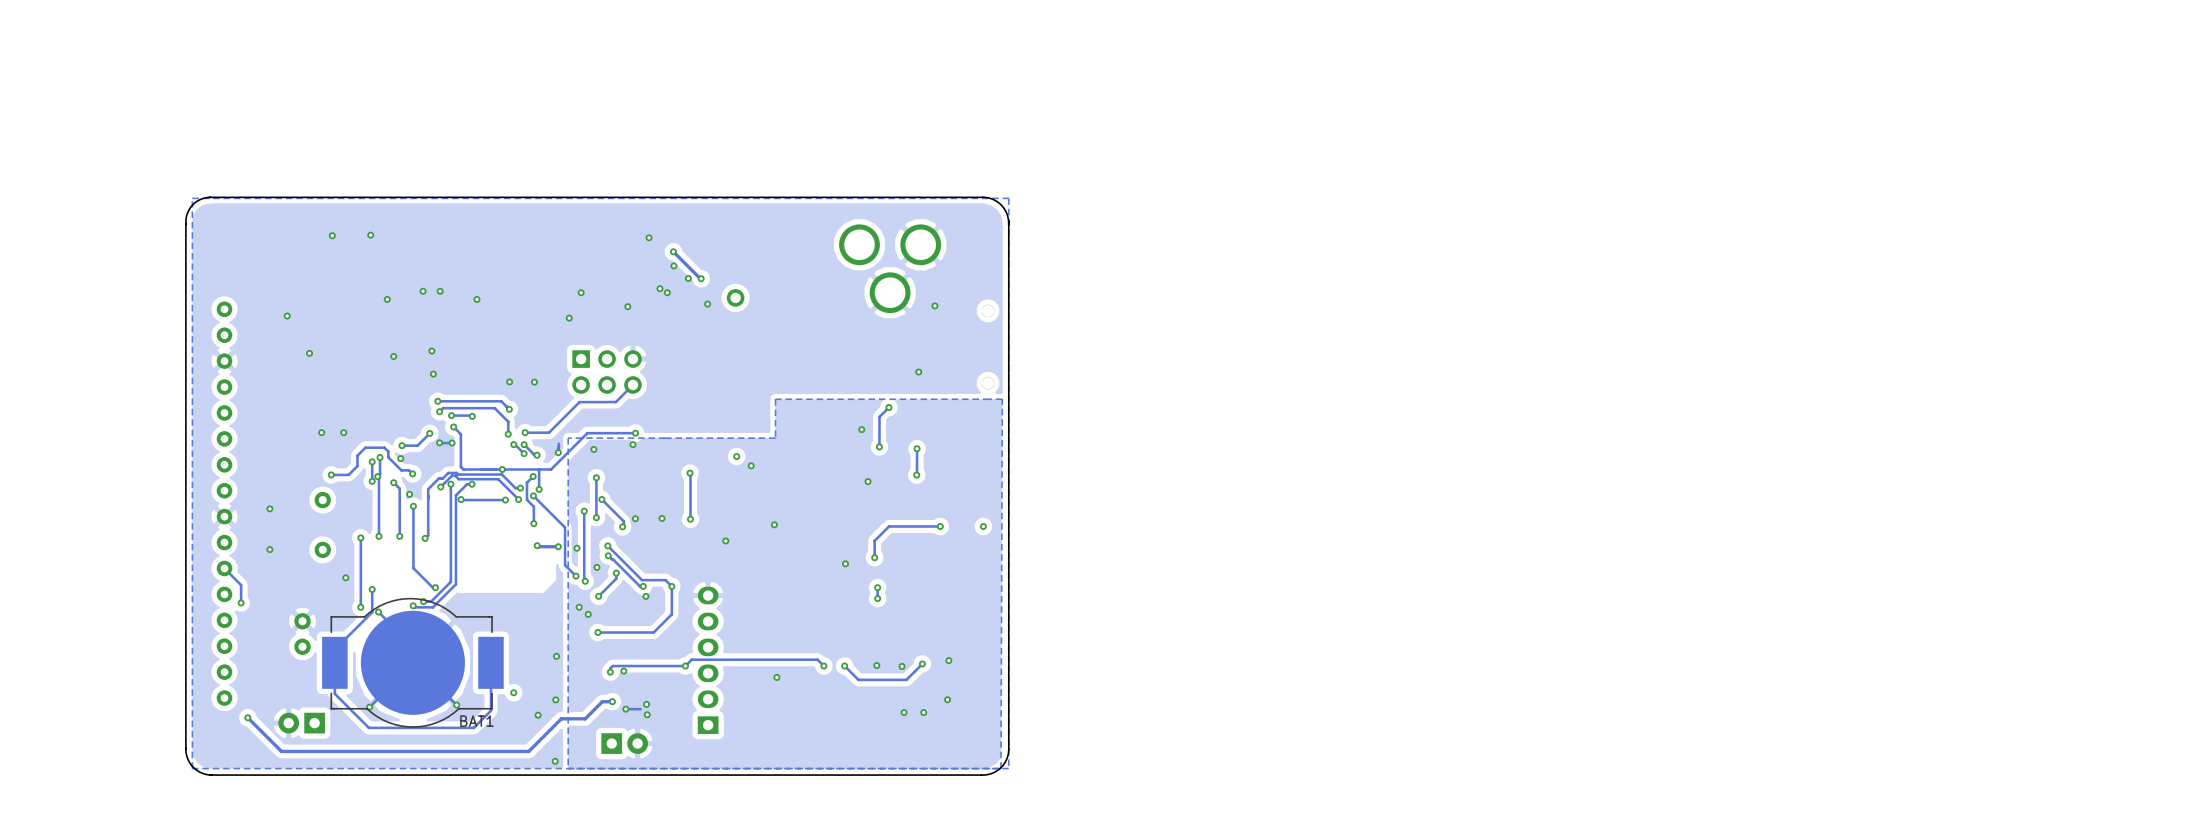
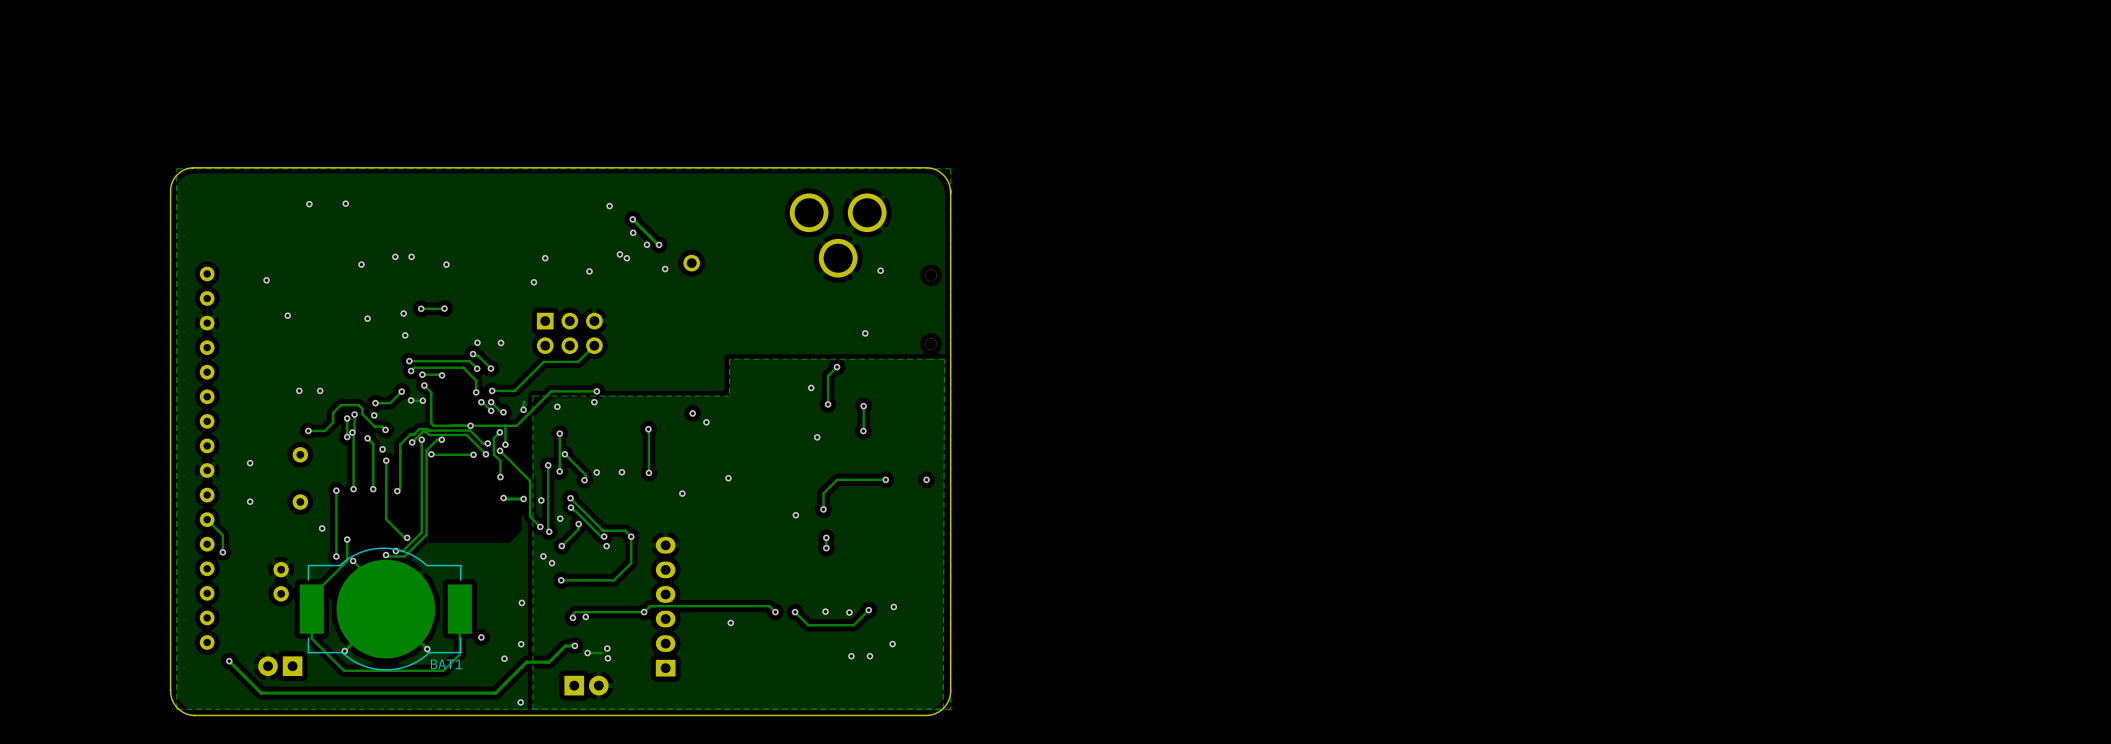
track: none -> (444, 308) (421, 308)
via: none -> (444, 308)
via: none -> (421, 308)
track: none -> (473, 354) (478, 355) (490, 368)
via: none -> (473, 354)
via: none -> (490, 368)

